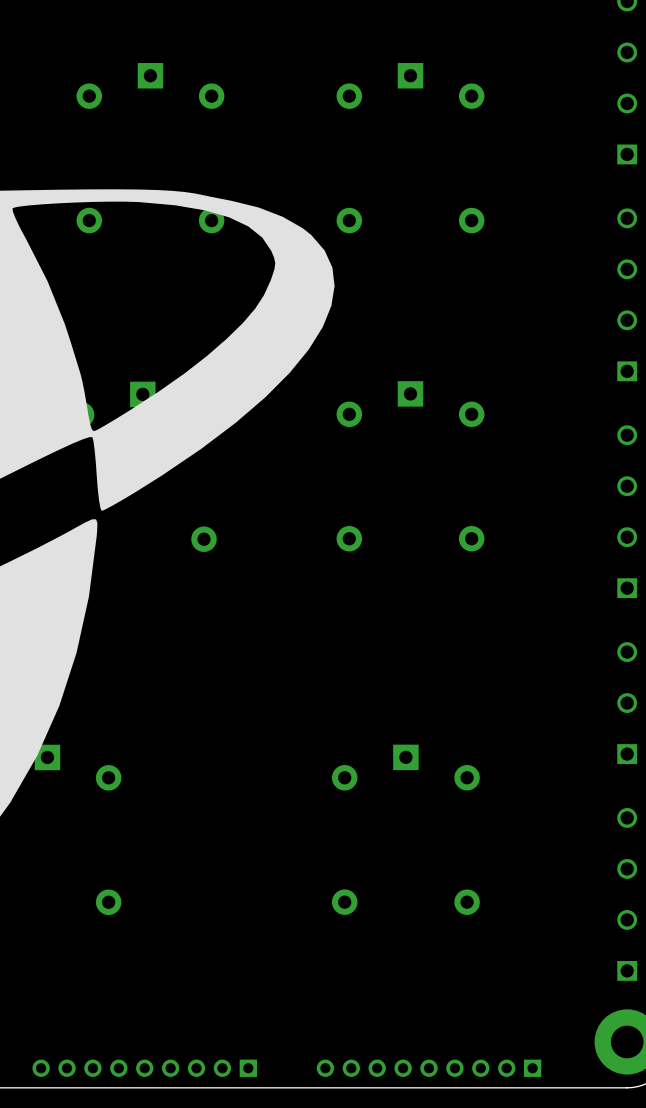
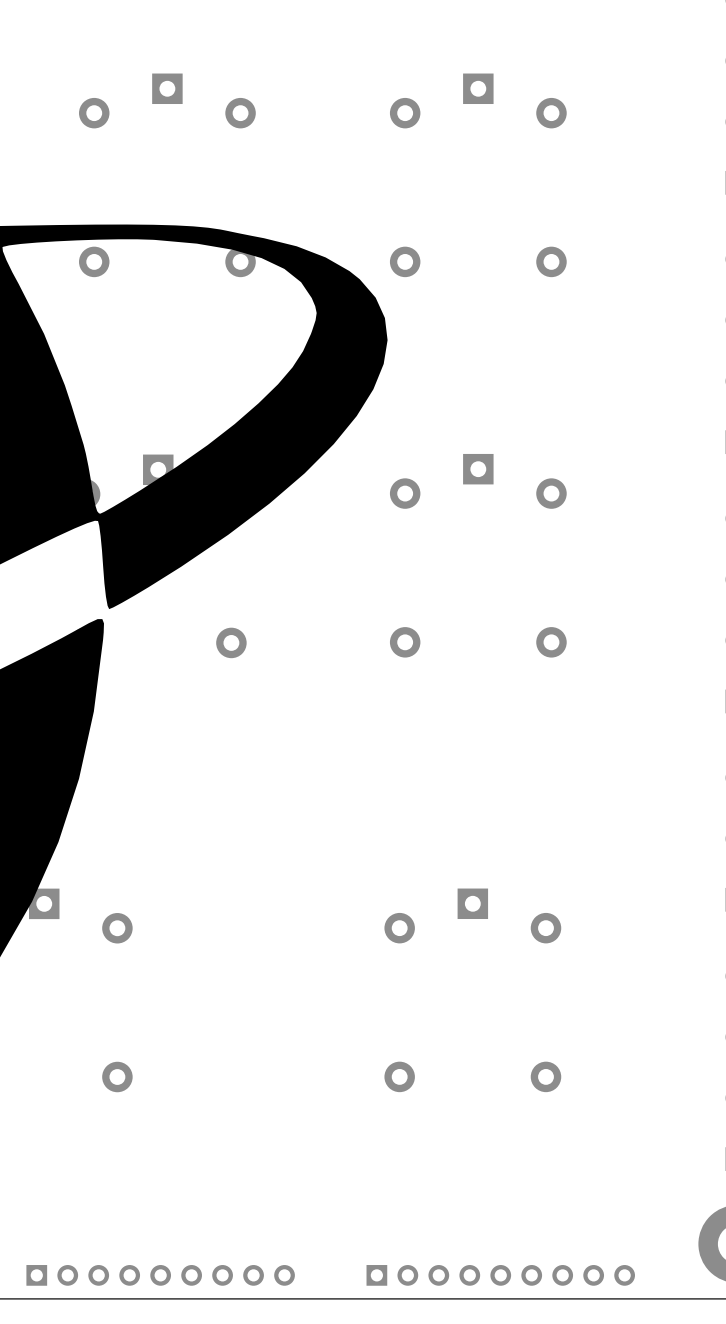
part rotation: 0° (144, 1068) -> 180° (160, 1275)
part rotation: 0° (429, 1068) -> 180° (500, 1275)

